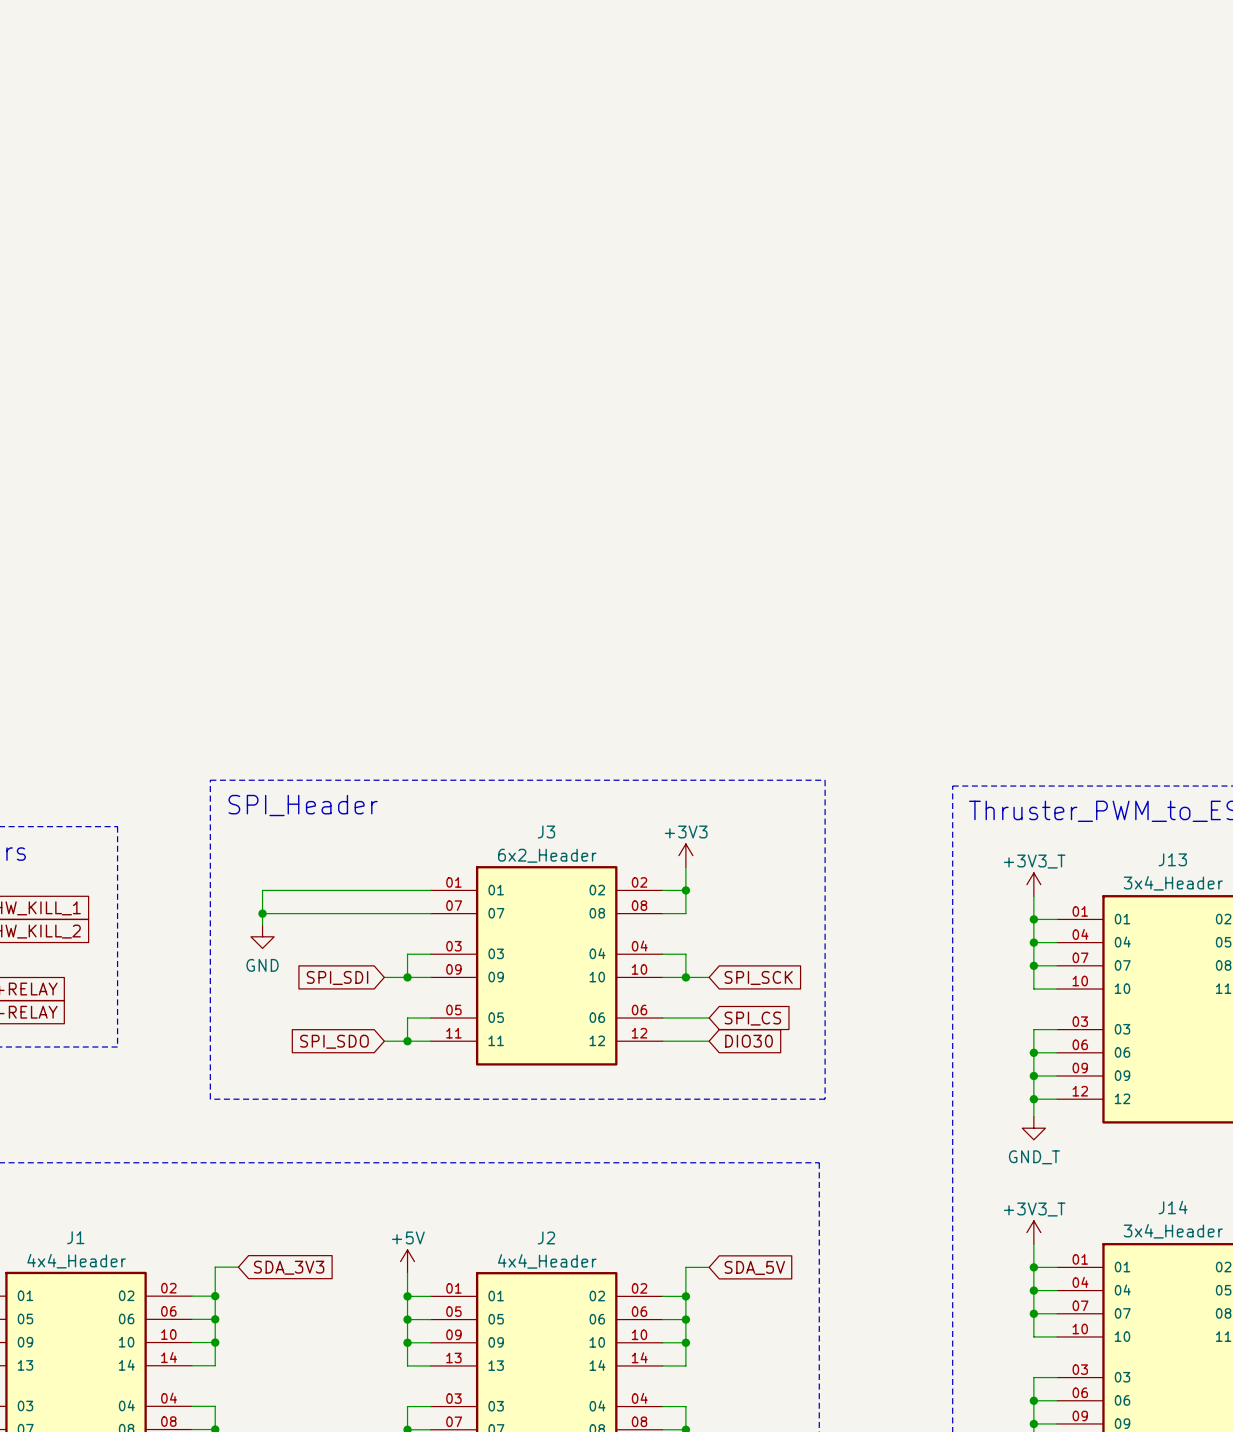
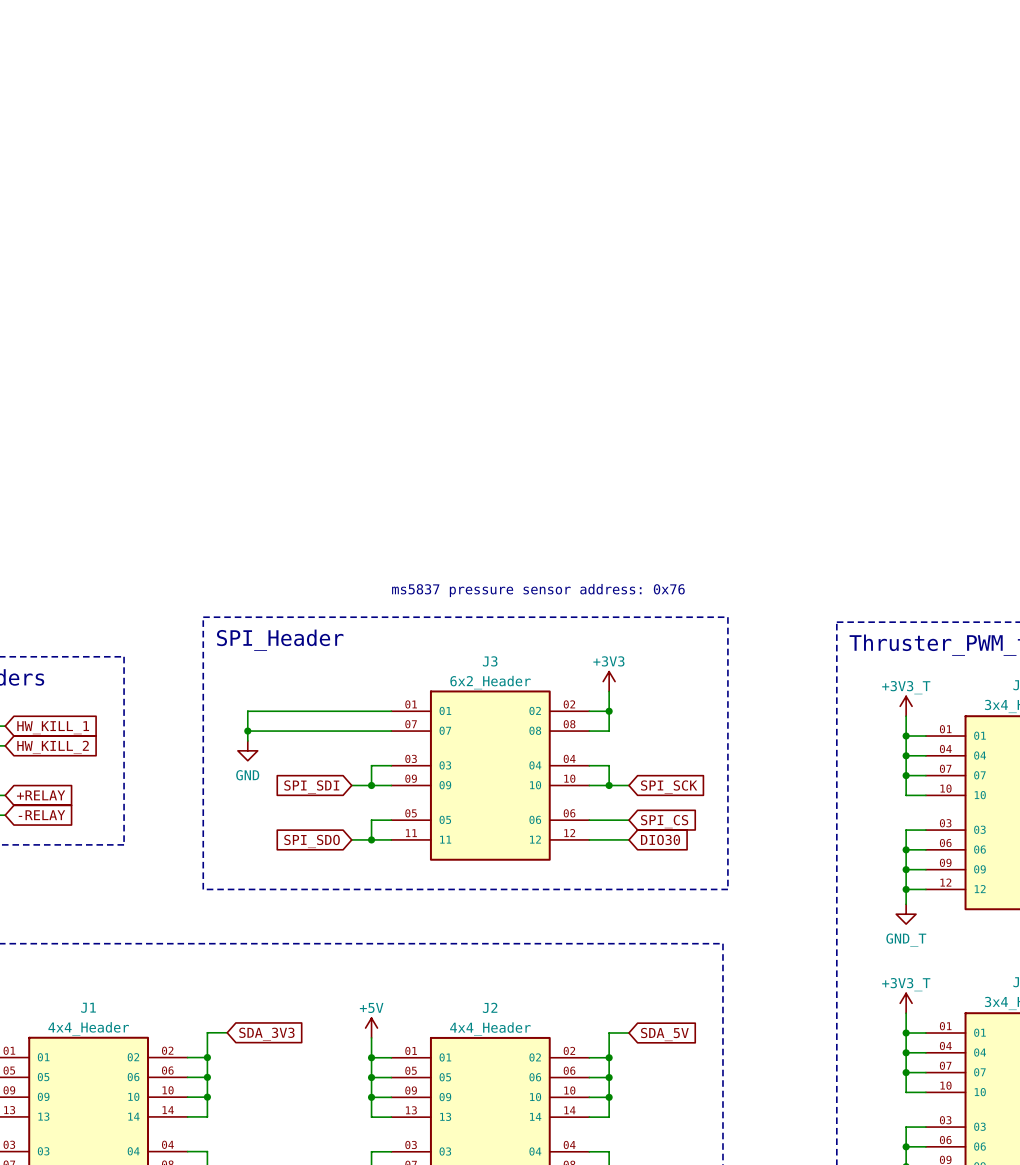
text: none -> ms5837 pressure sensor address: 0x76 (538, 590)

